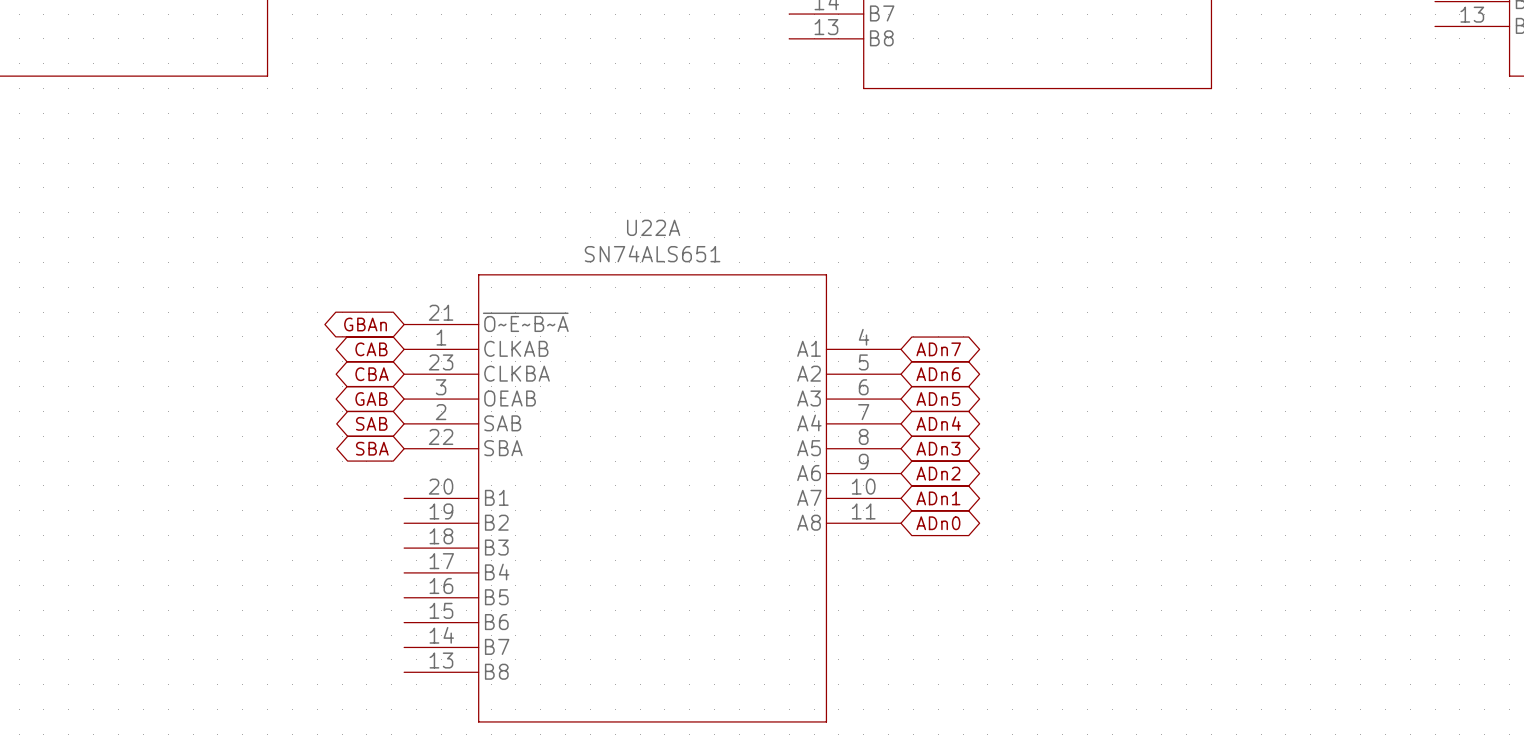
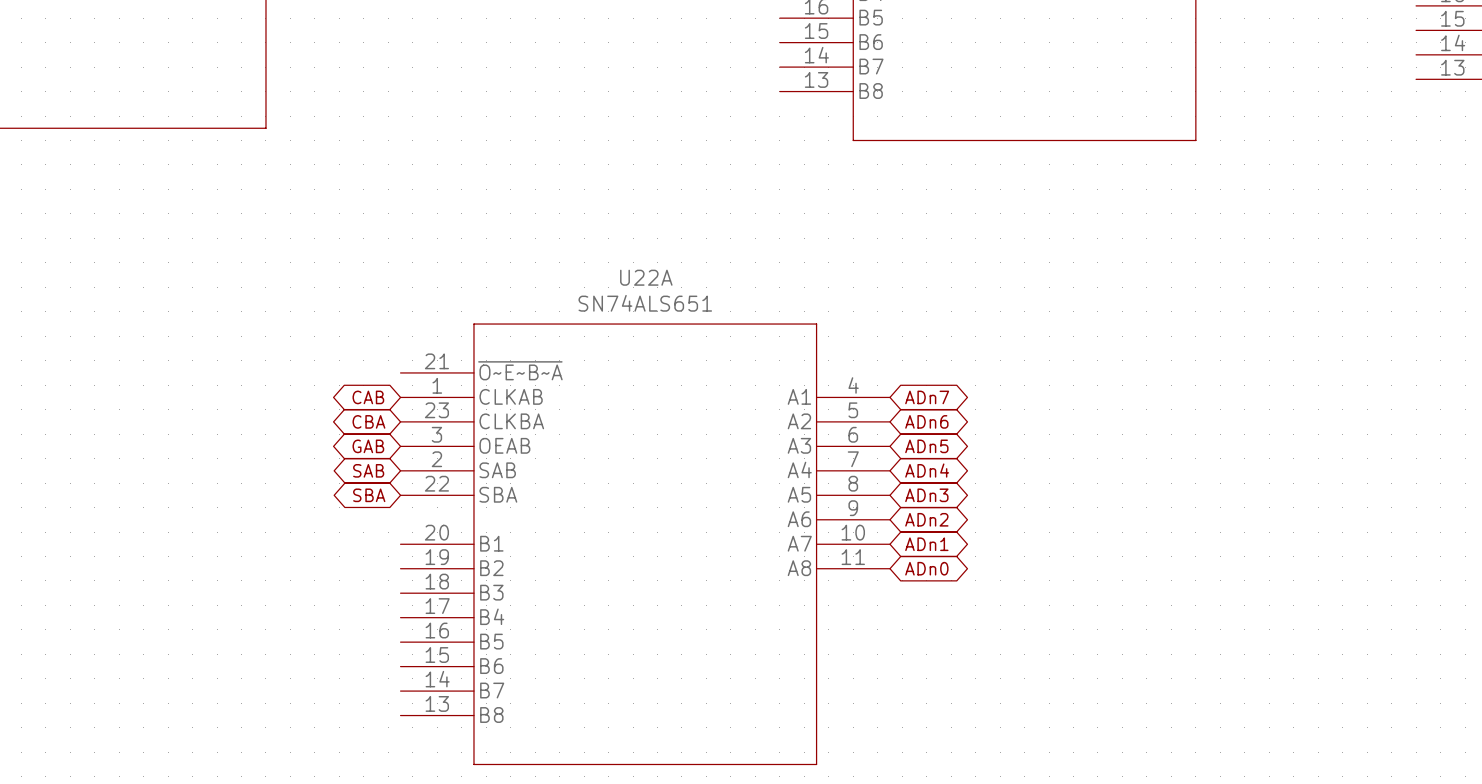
global label: GBAn (365, 324) -> none

